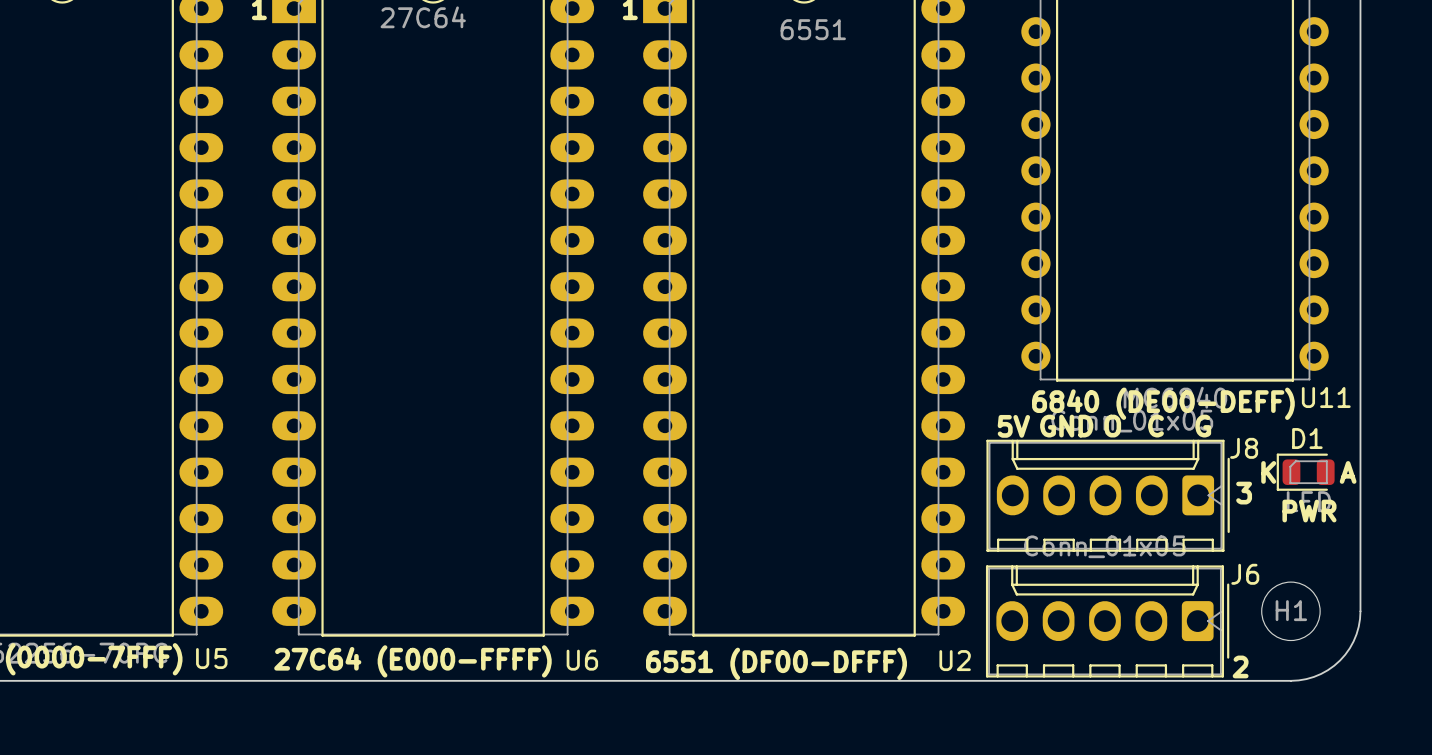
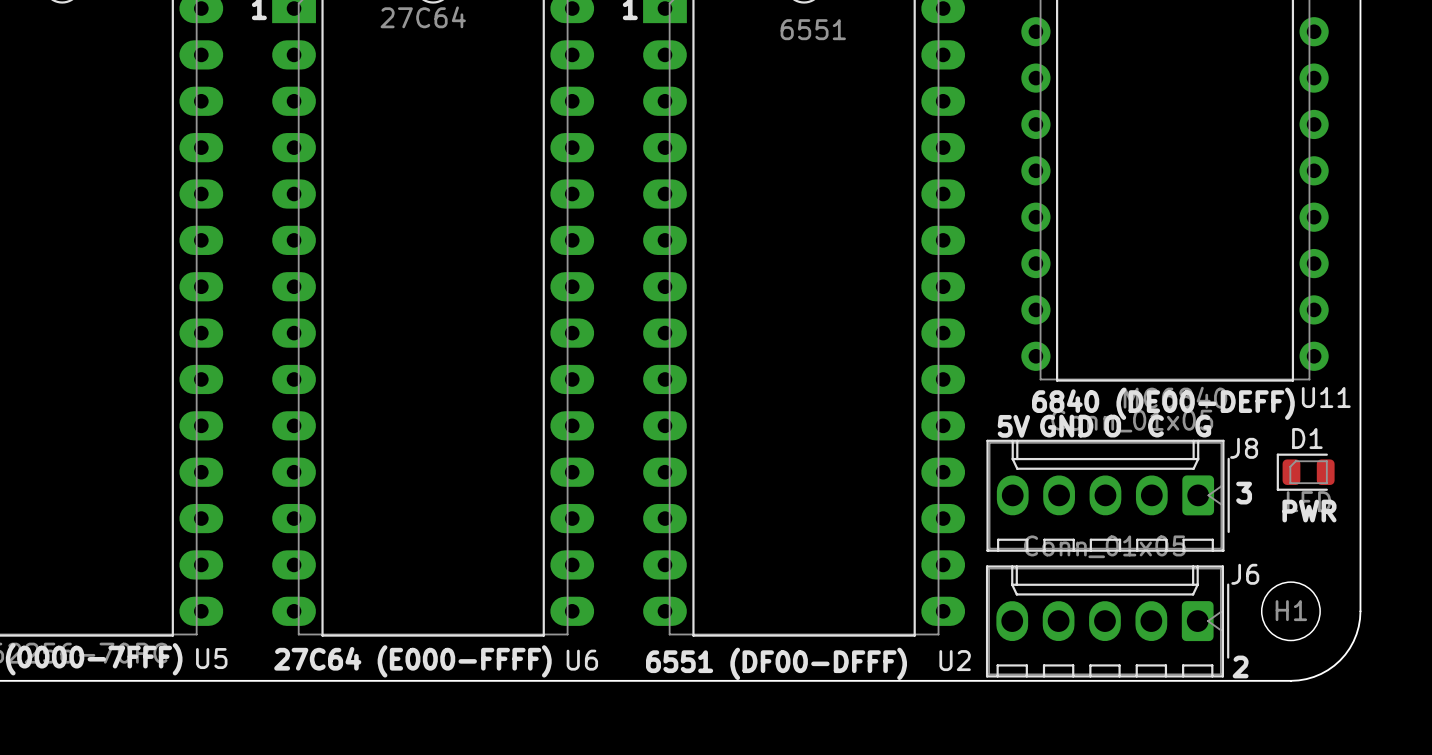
text: K (1268, 472) -> none
text: A (1348, 472) -> none

